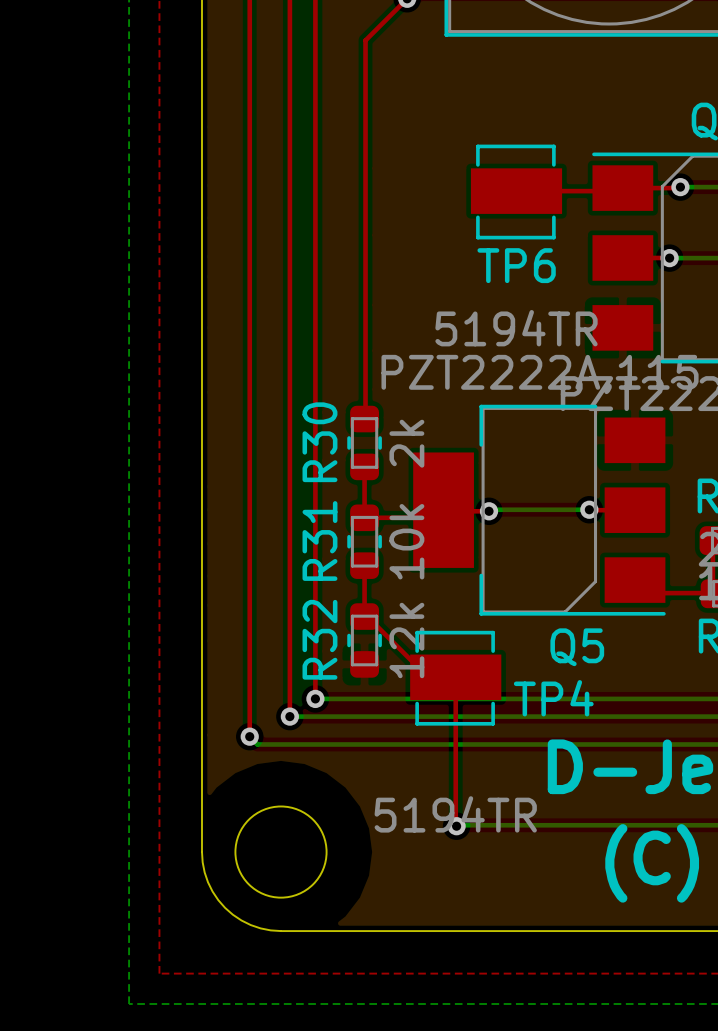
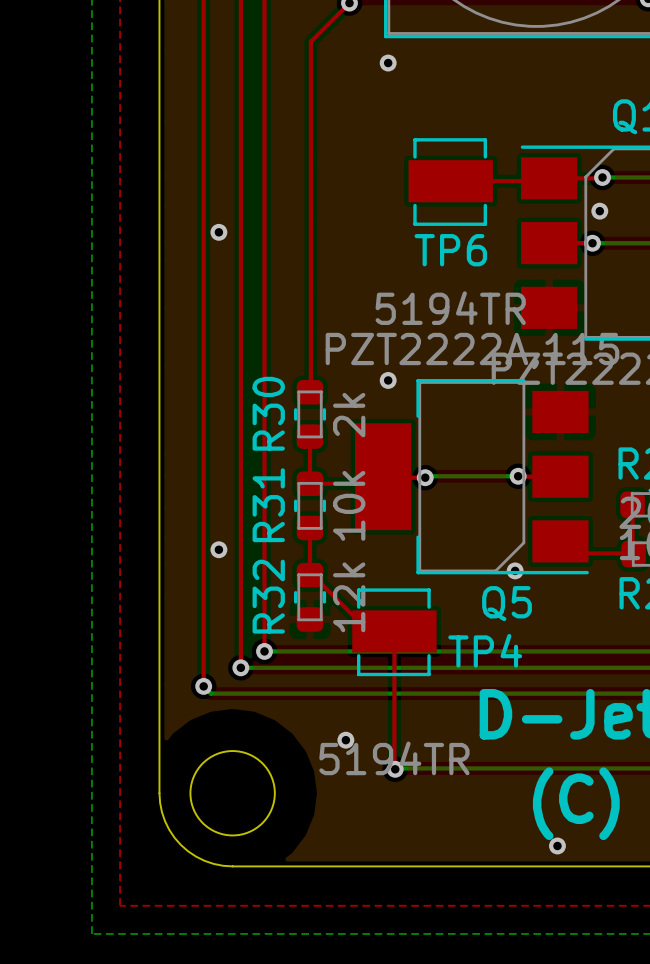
via: none -> (388, 63)
via: none -> (599, 211)
via: none -> (218, 232)
via: none -> (388, 380)
via: none -> (218, 549)
via: none -> (515, 570)
via: none -> (345, 740)
via: none -> (557, 845)

